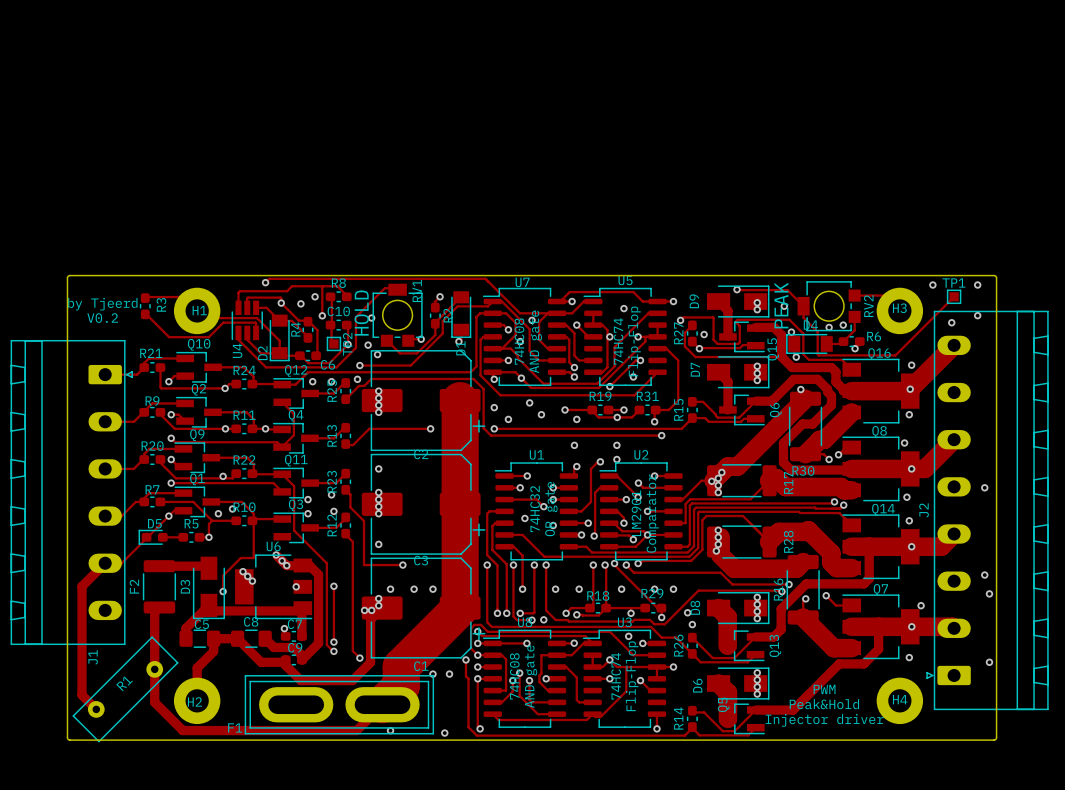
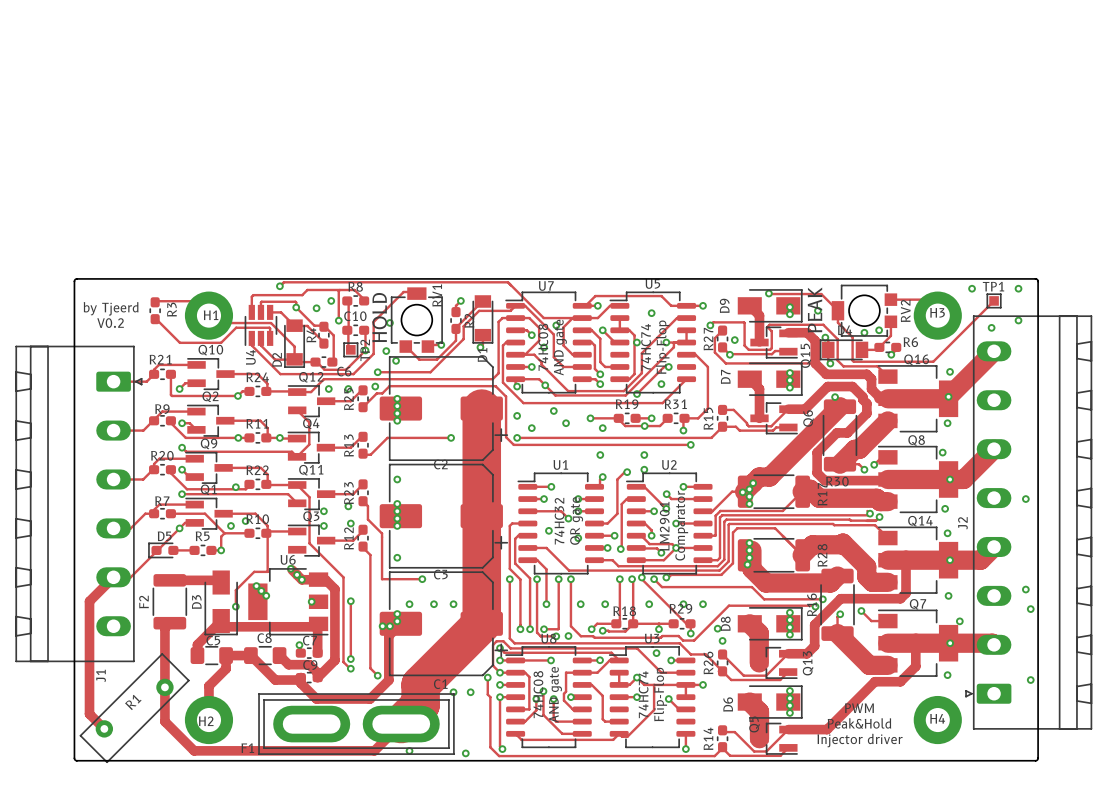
via: none -> (948, 595)

